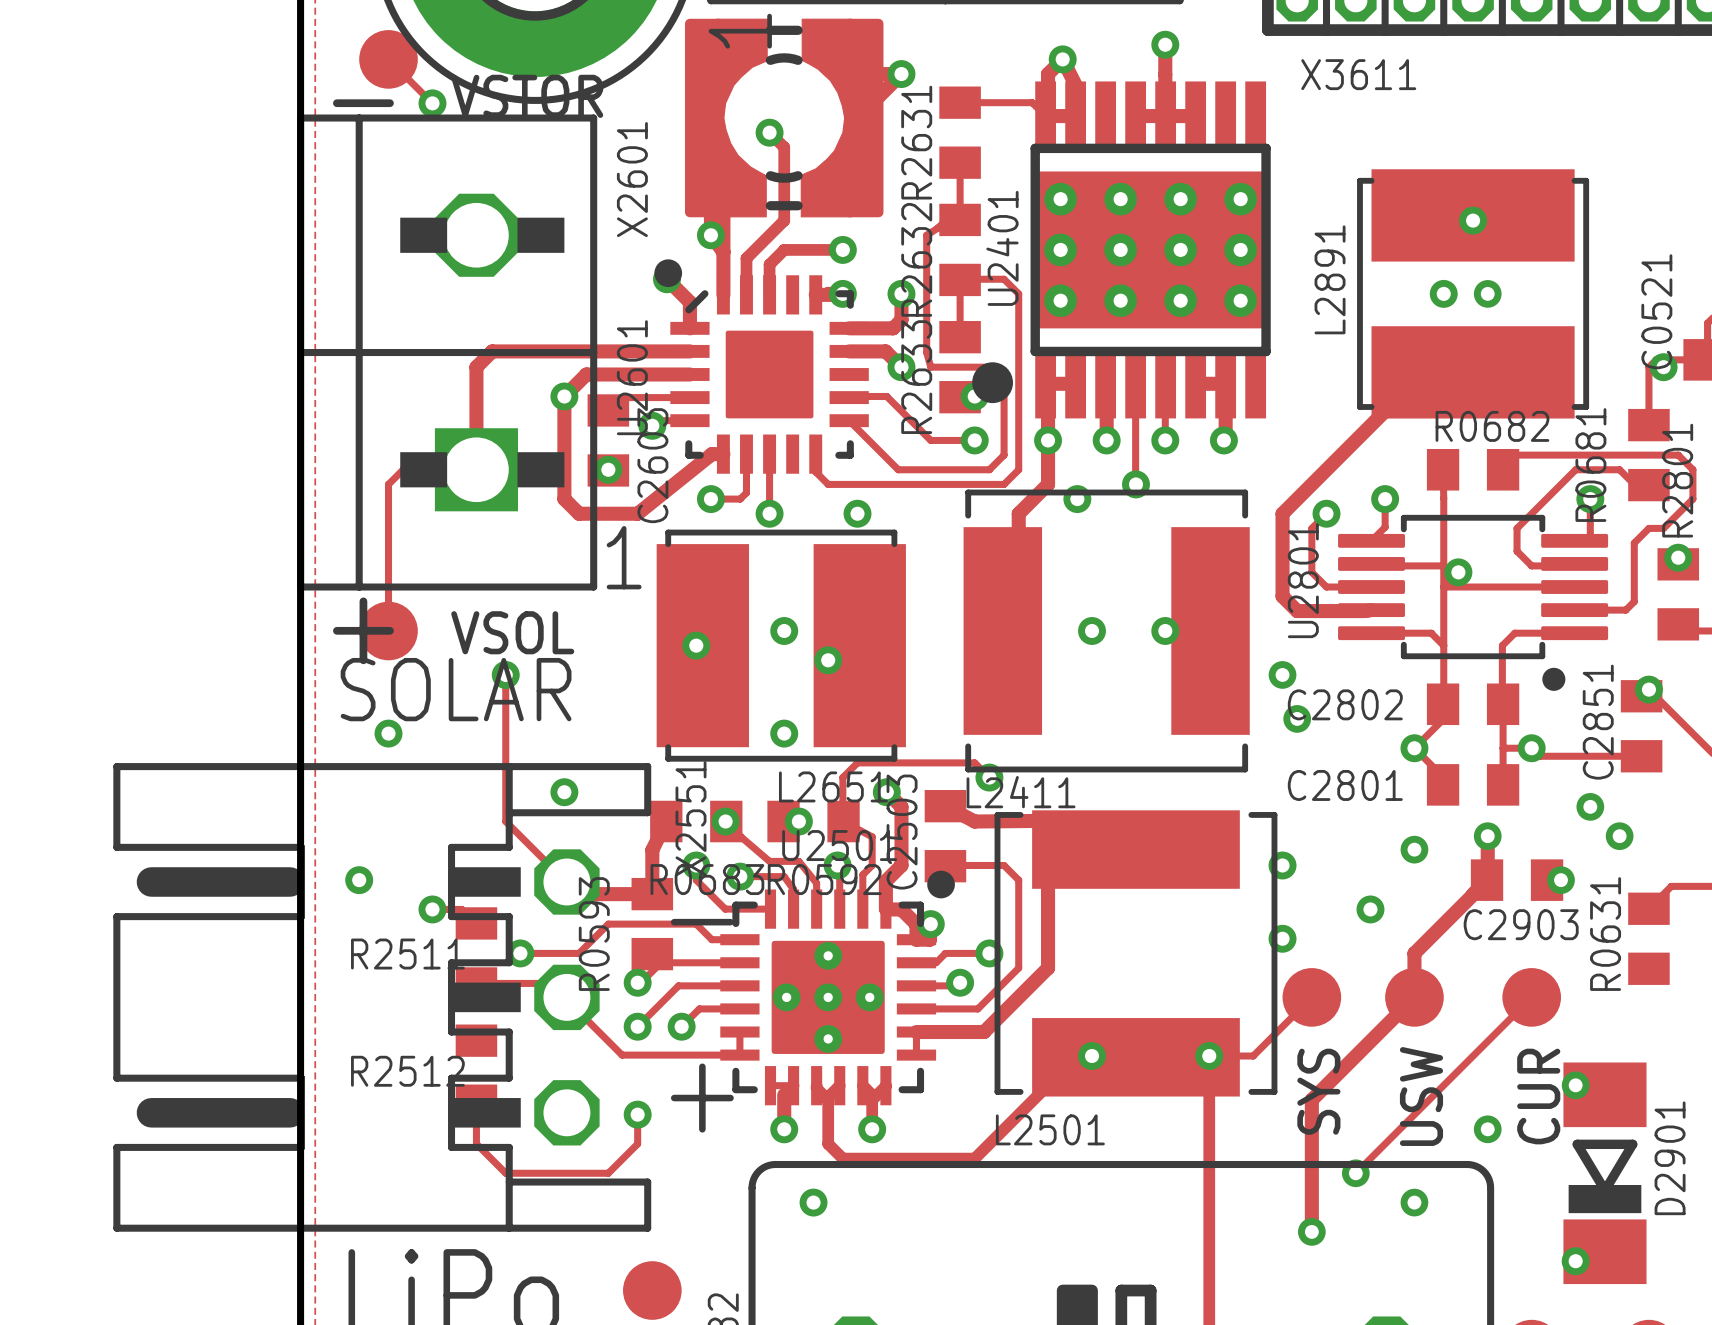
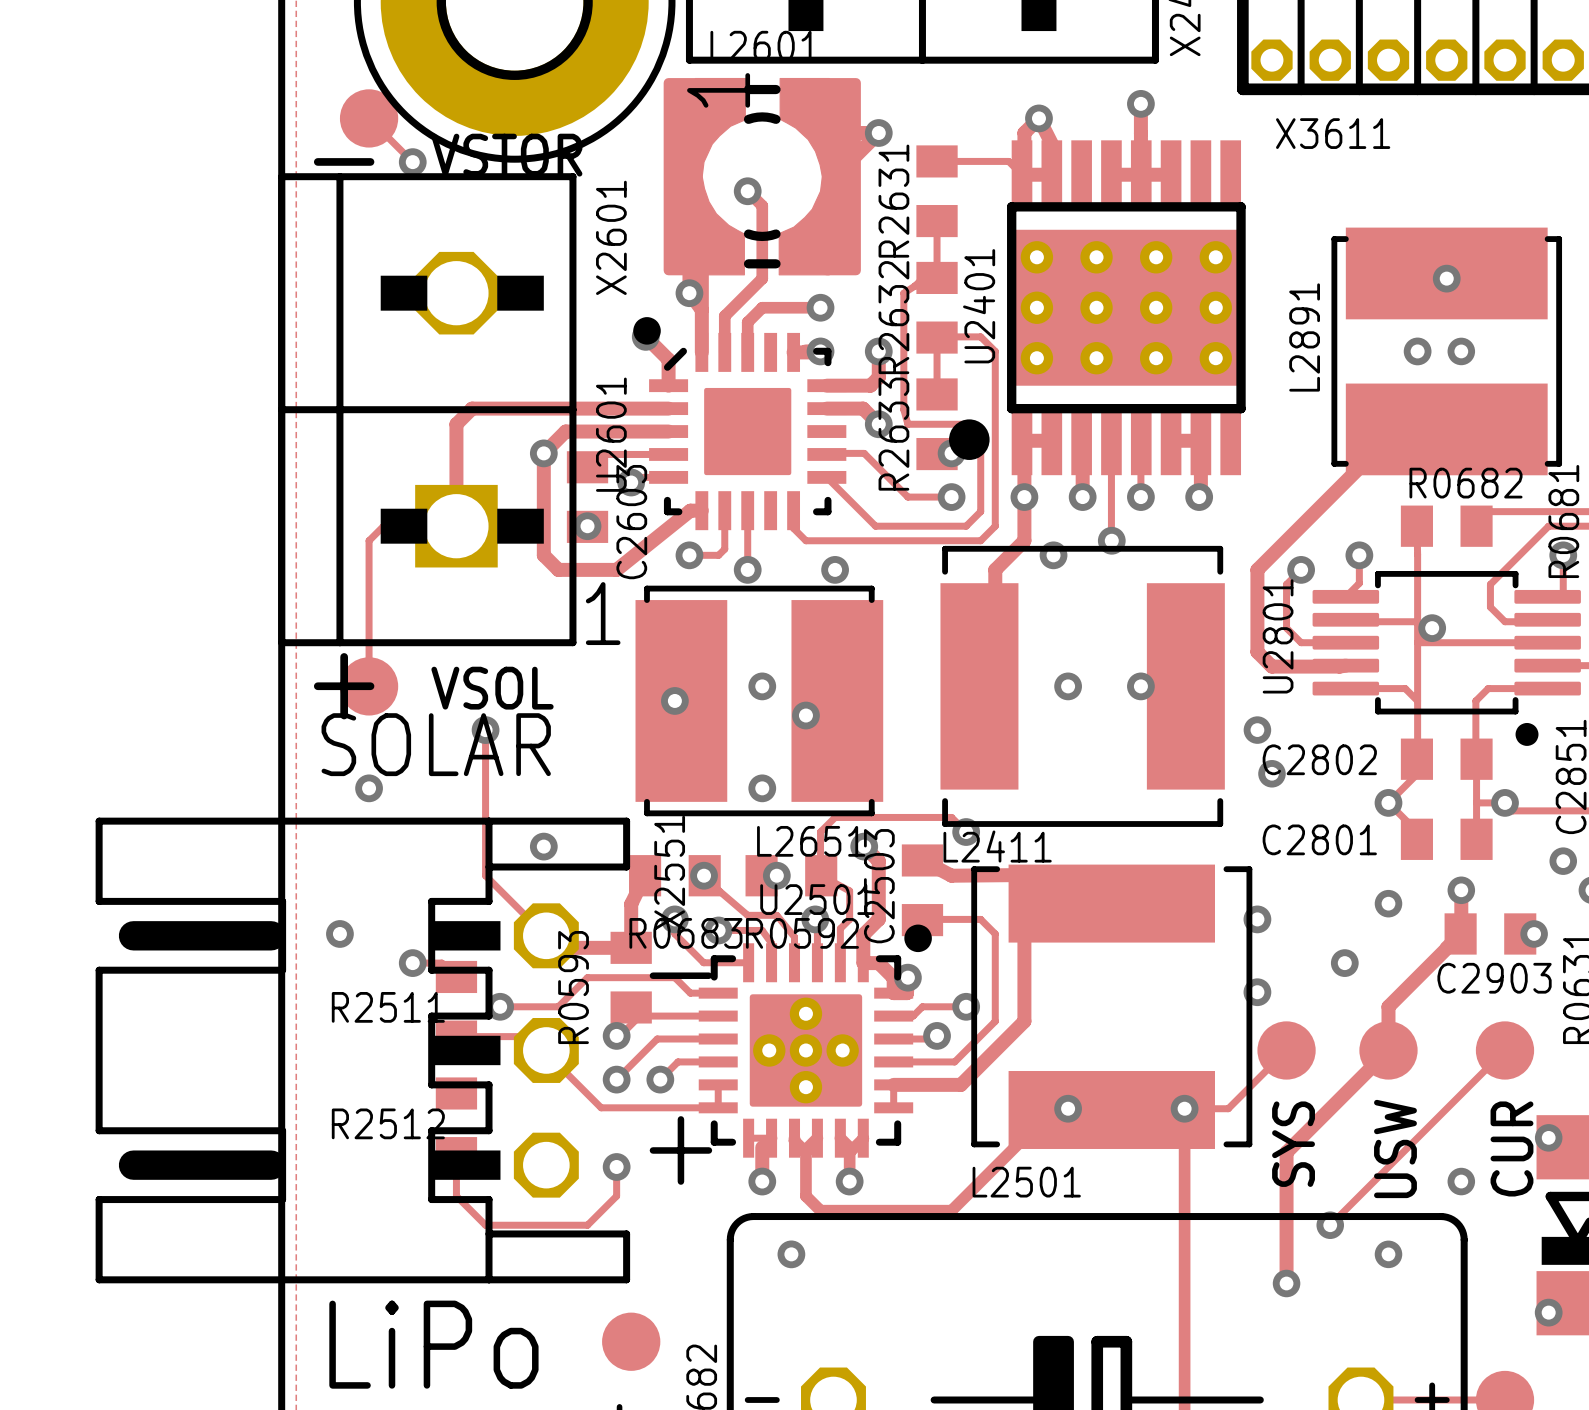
U2501 footprint: [720, 870, 955, 1106] -> [698, 924, 932, 1158]

